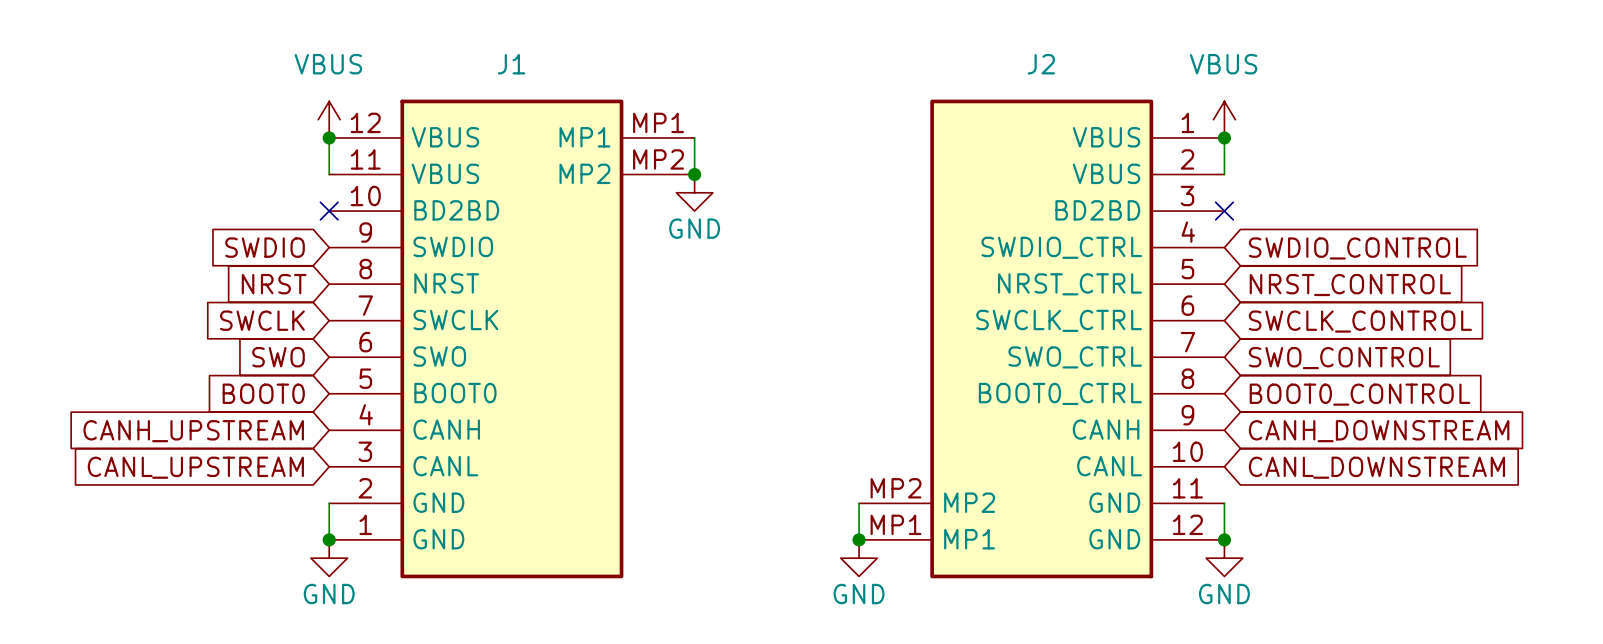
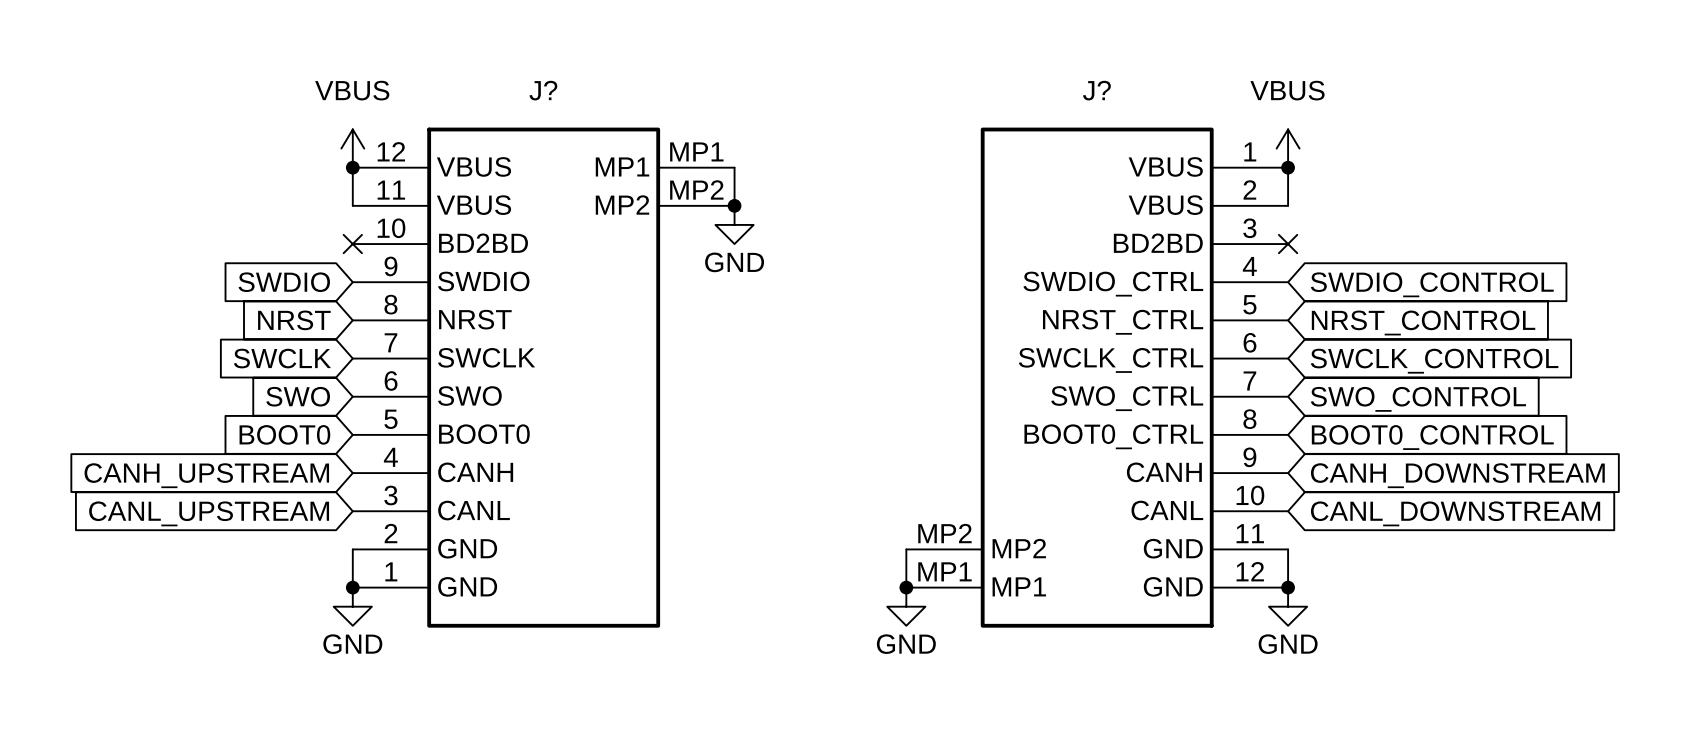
J1 name: J1 (511, 64) -> J? (543, 90)
J2 name: J2 (1041, 64) -> J? (1096, 90)

